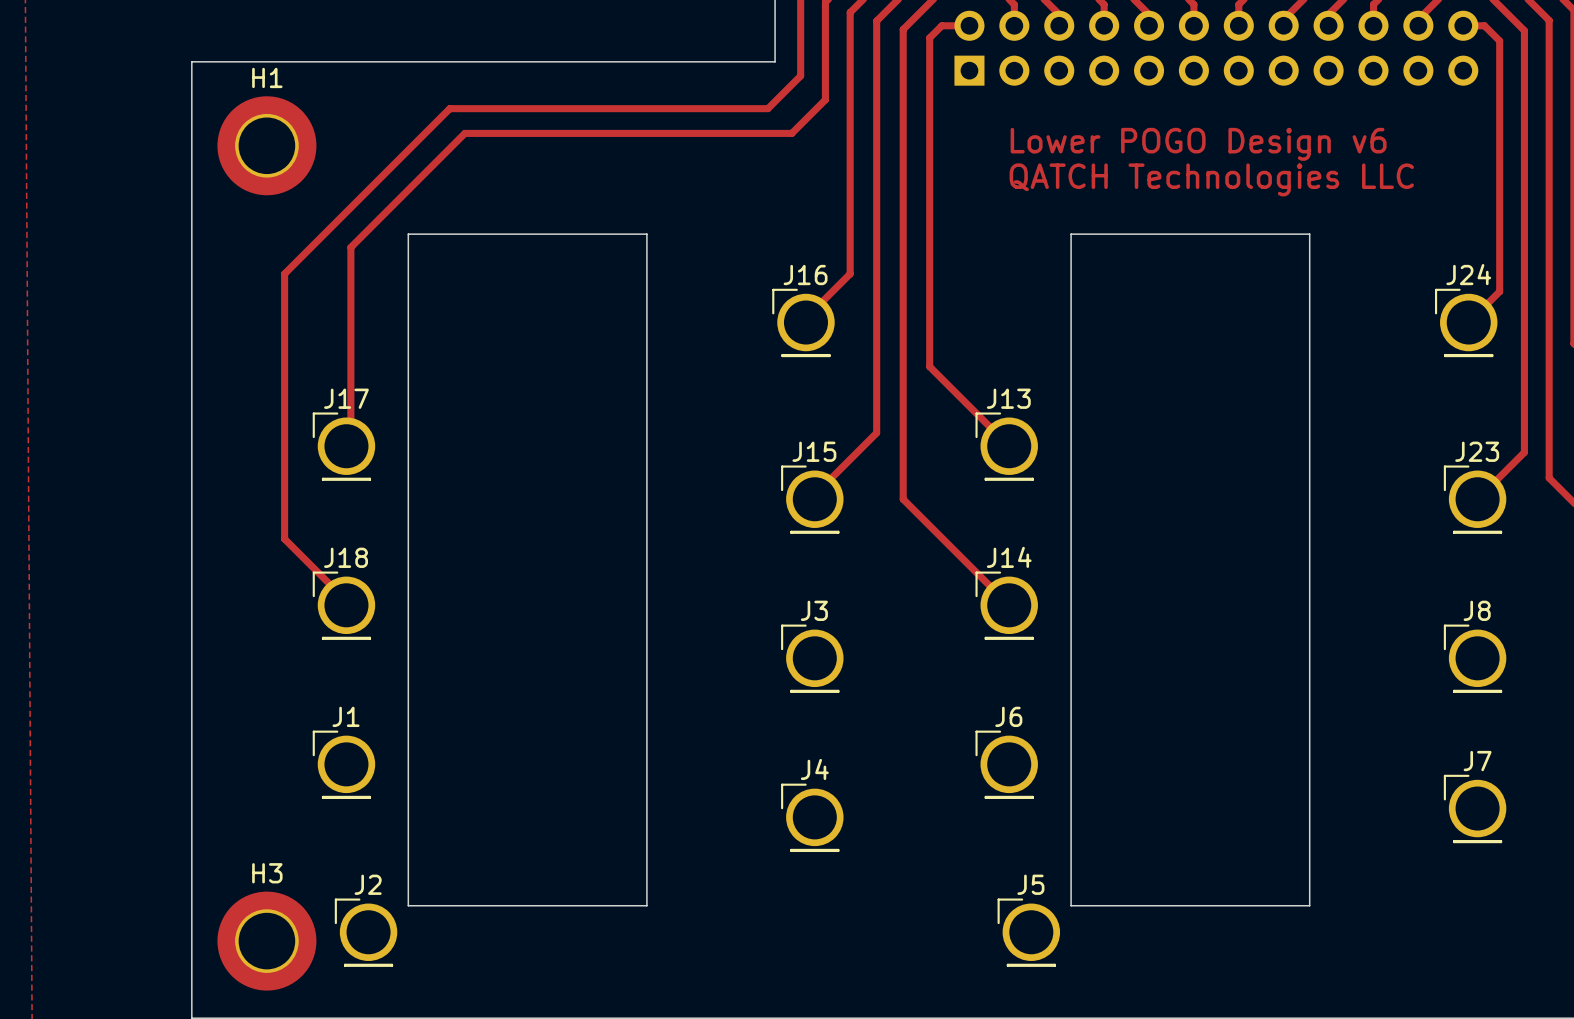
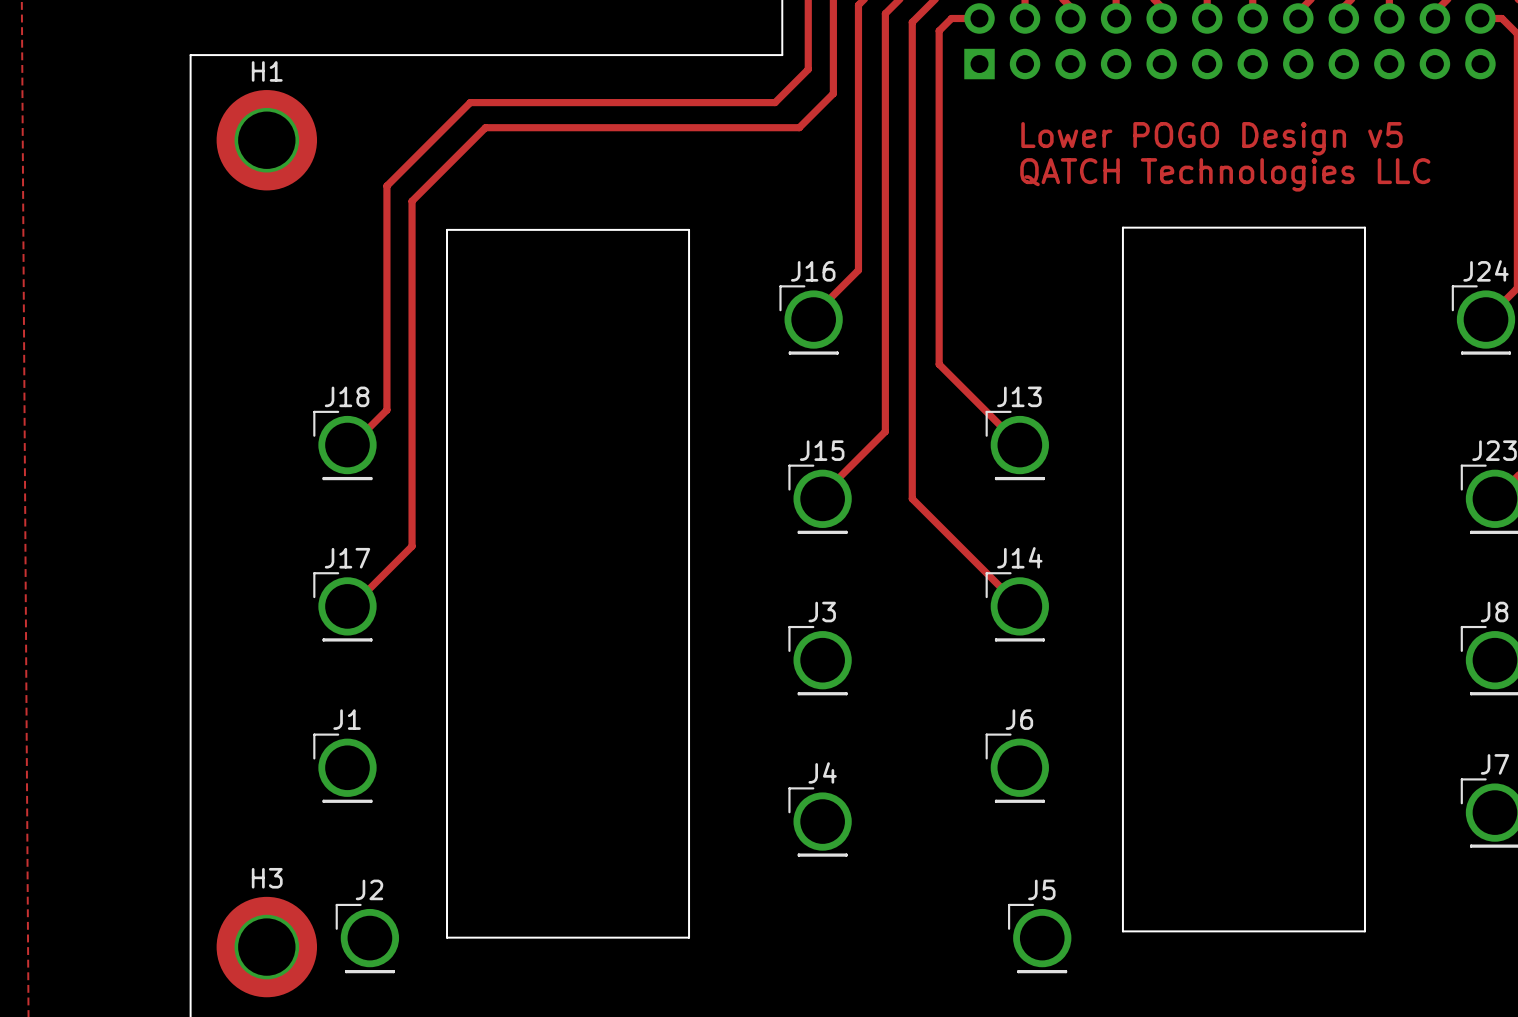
track: (467, 108) (449, 108) (284, 273) (284, 539) (350, 605) -> (485, 127) (412, 201) (412, 546) (351, 606)
track: (482, 133) (464, 133) (350, 247) (350, 446) -> (470, 102) (386, 185) (386, 410) (351, 445)
text: Lower POGO Design v6 (1198, 144) -> Lower POGO Design v5 (1211, 138)
board edge: (444, 234) (408, 234) (408, 905) (646, 905) (646, 234) -> (447, 229) (447, 937) (689, 937) (689, 229) (652, 229)
board edge: (1071, 234) (1309, 234) (1309, 905) (1071, 905) (1071, 234) -> (1122, 227) (1122, 931) (1364, 931) (1364, 227) (1122, 227)
J17 name: J17 (346, 398) -> J18 (347, 396)
J18 name: J18 (346, 557) -> J17 (347, 558)

